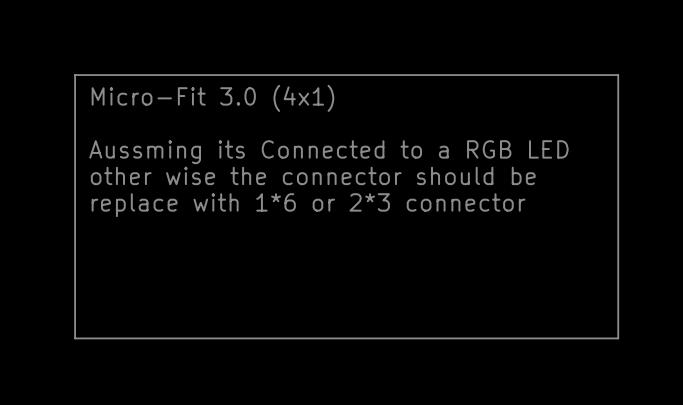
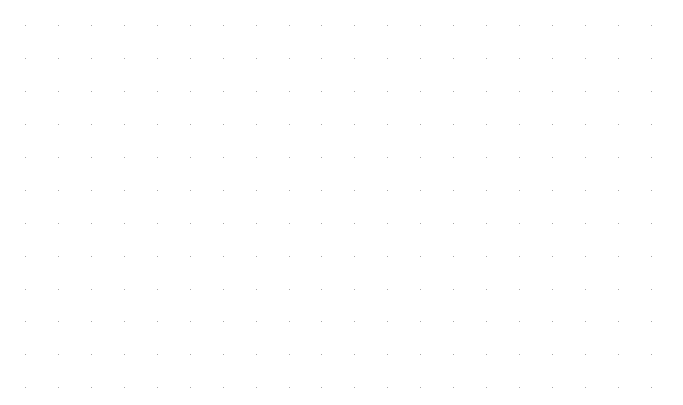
line: (75, 75) (618, 75) (618, 338) (75, 338) (75, 75) -> none
text: Micro-Fit 3.0 (4x1) (212, 98) -> none
text: Aussming its Connected to a RGB LED (328, 152) -> none
text: other wise the connector should be (313, 175) -> none
text: replace with 1*6 or 2*3 connector (308, 205) -> none

